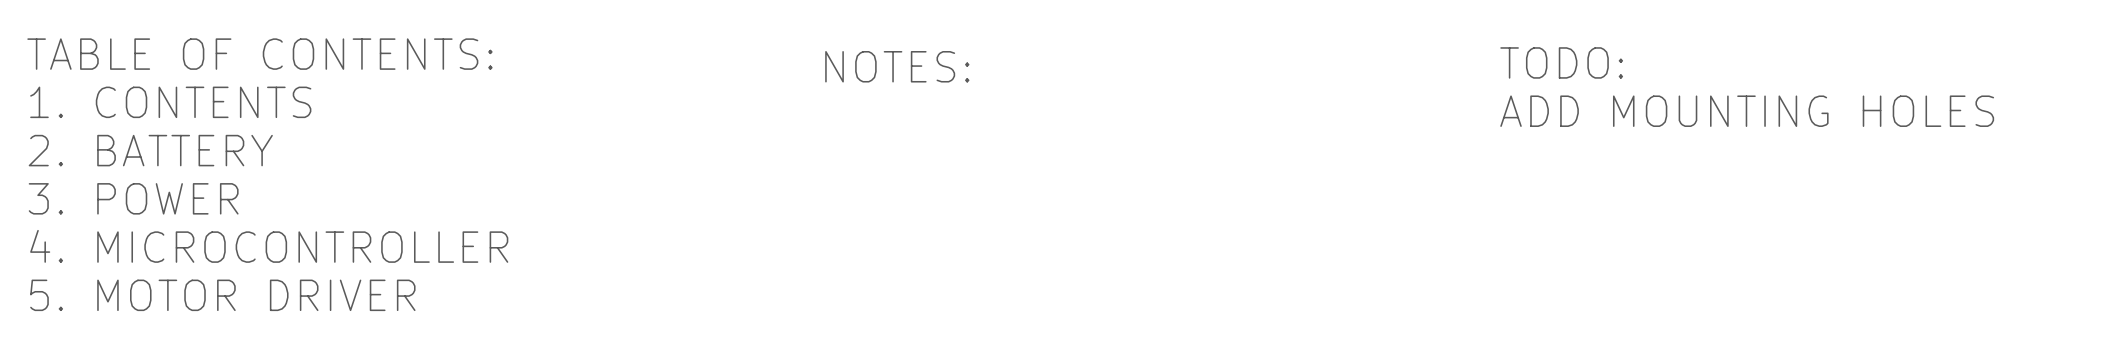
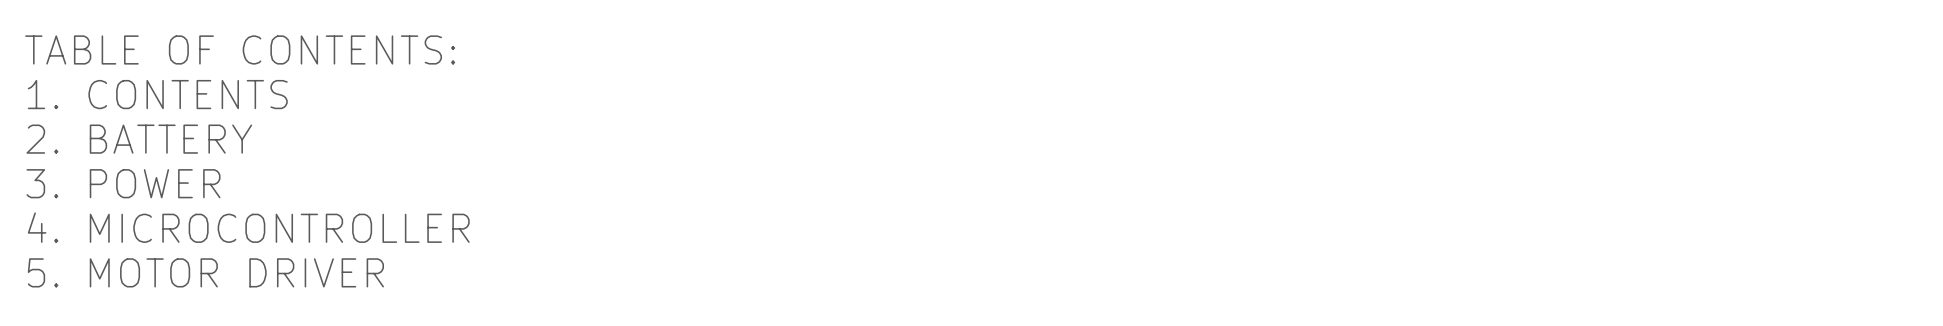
text: TODO: (1561, 62) -> none
text: NOTES: (897, 66) -> none
text: ADD MOUNTING HOLES (1747, 111) -> none

